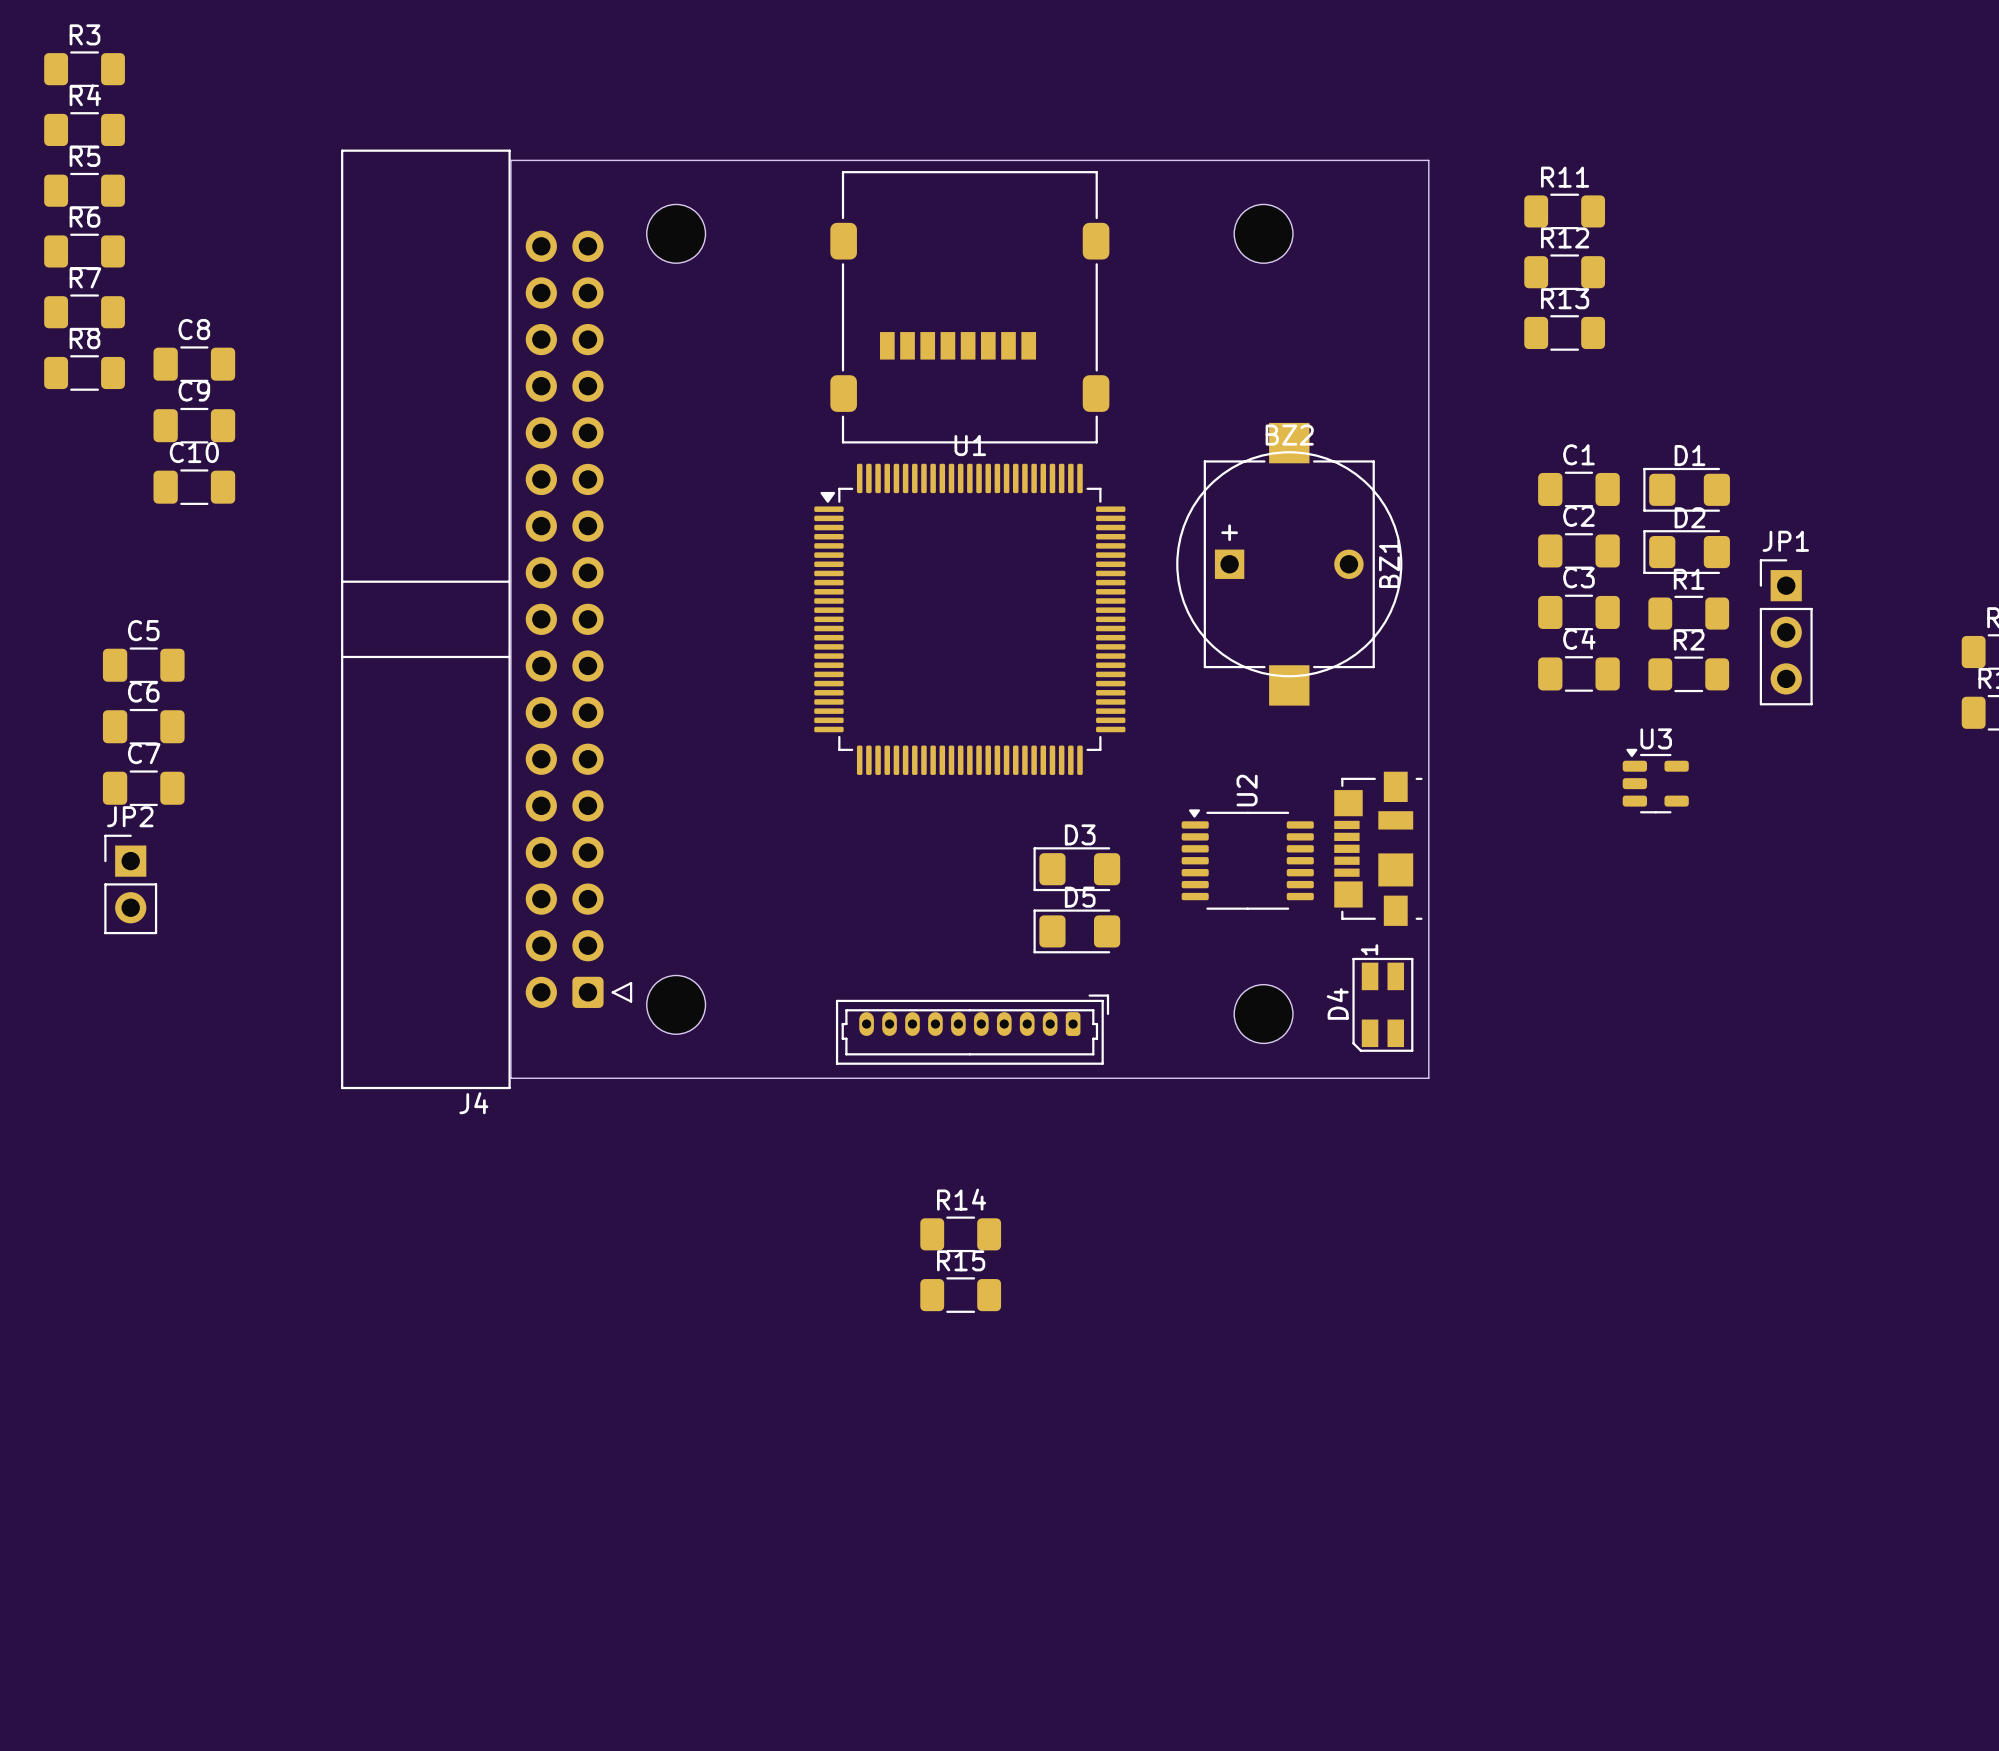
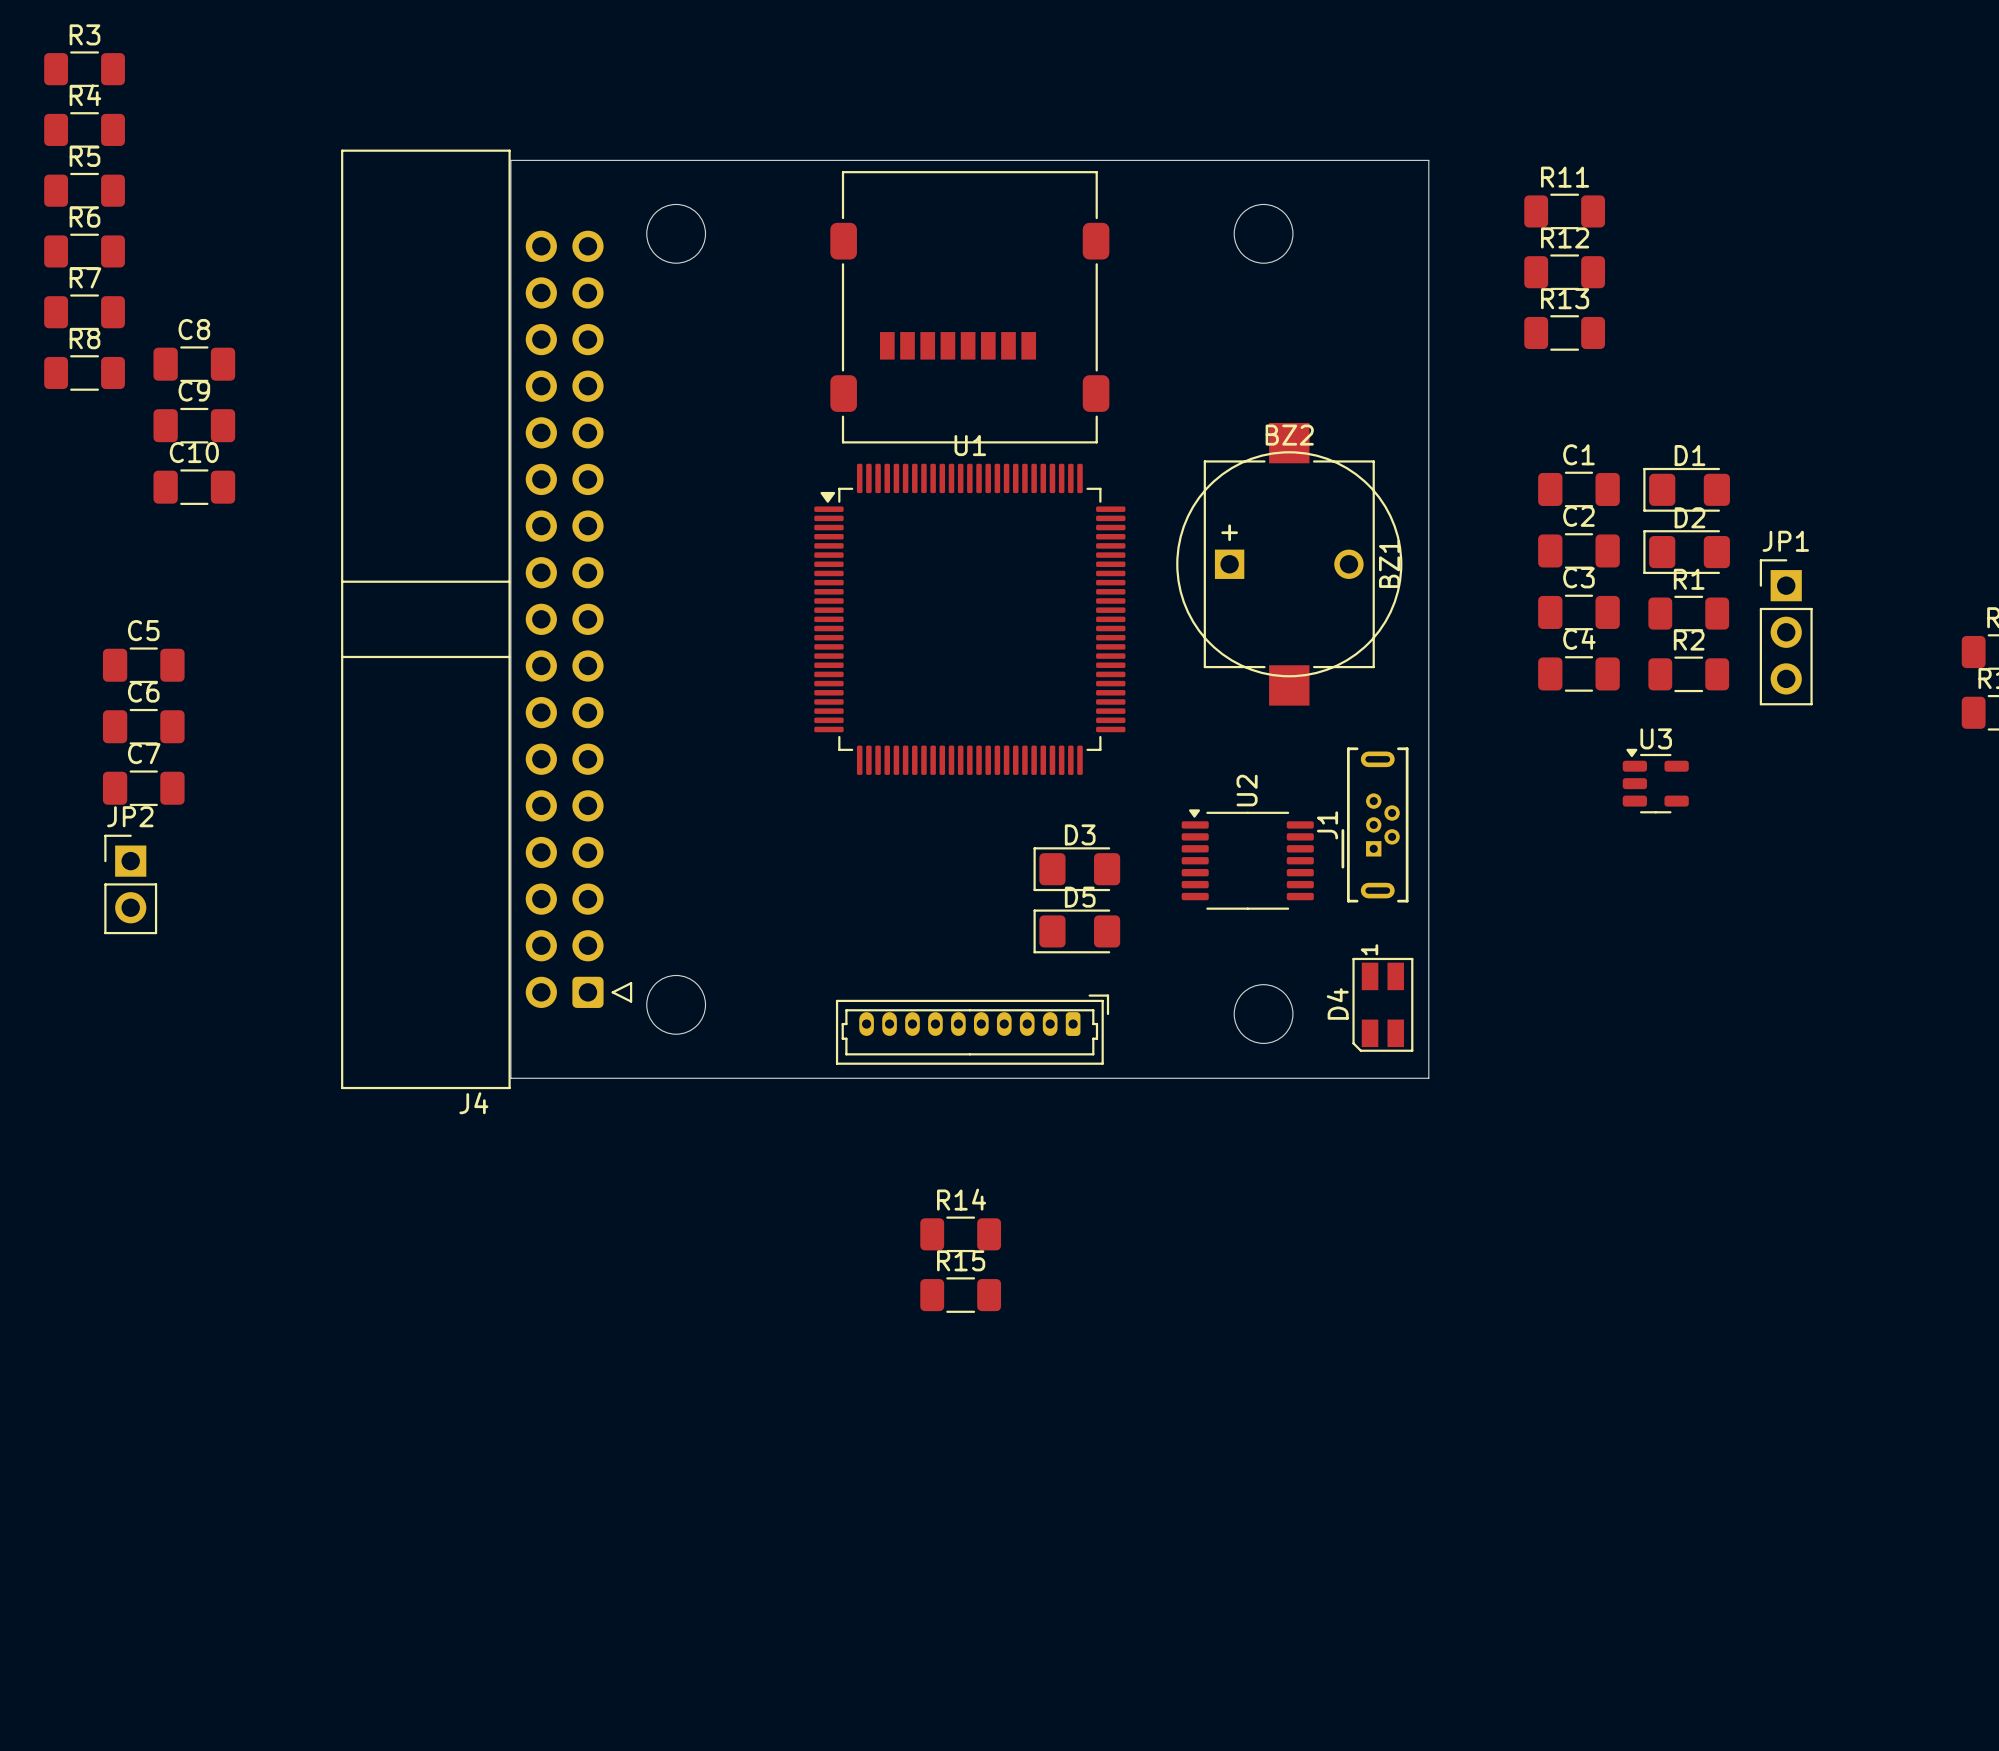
J1: none -> (1375, 824)
part: (1378, 848) -> none

